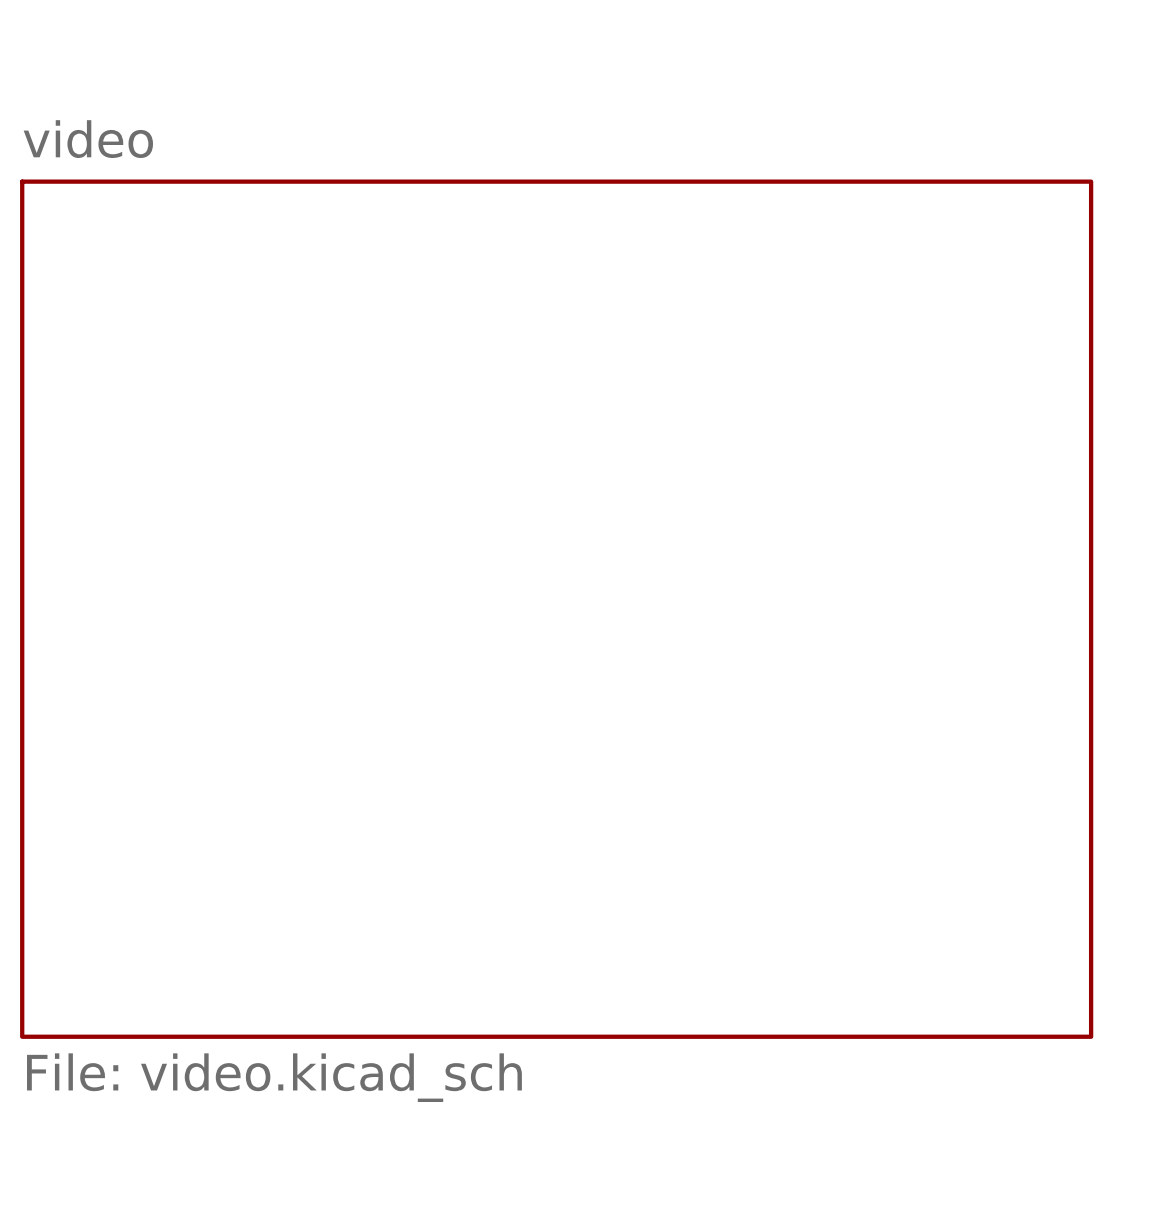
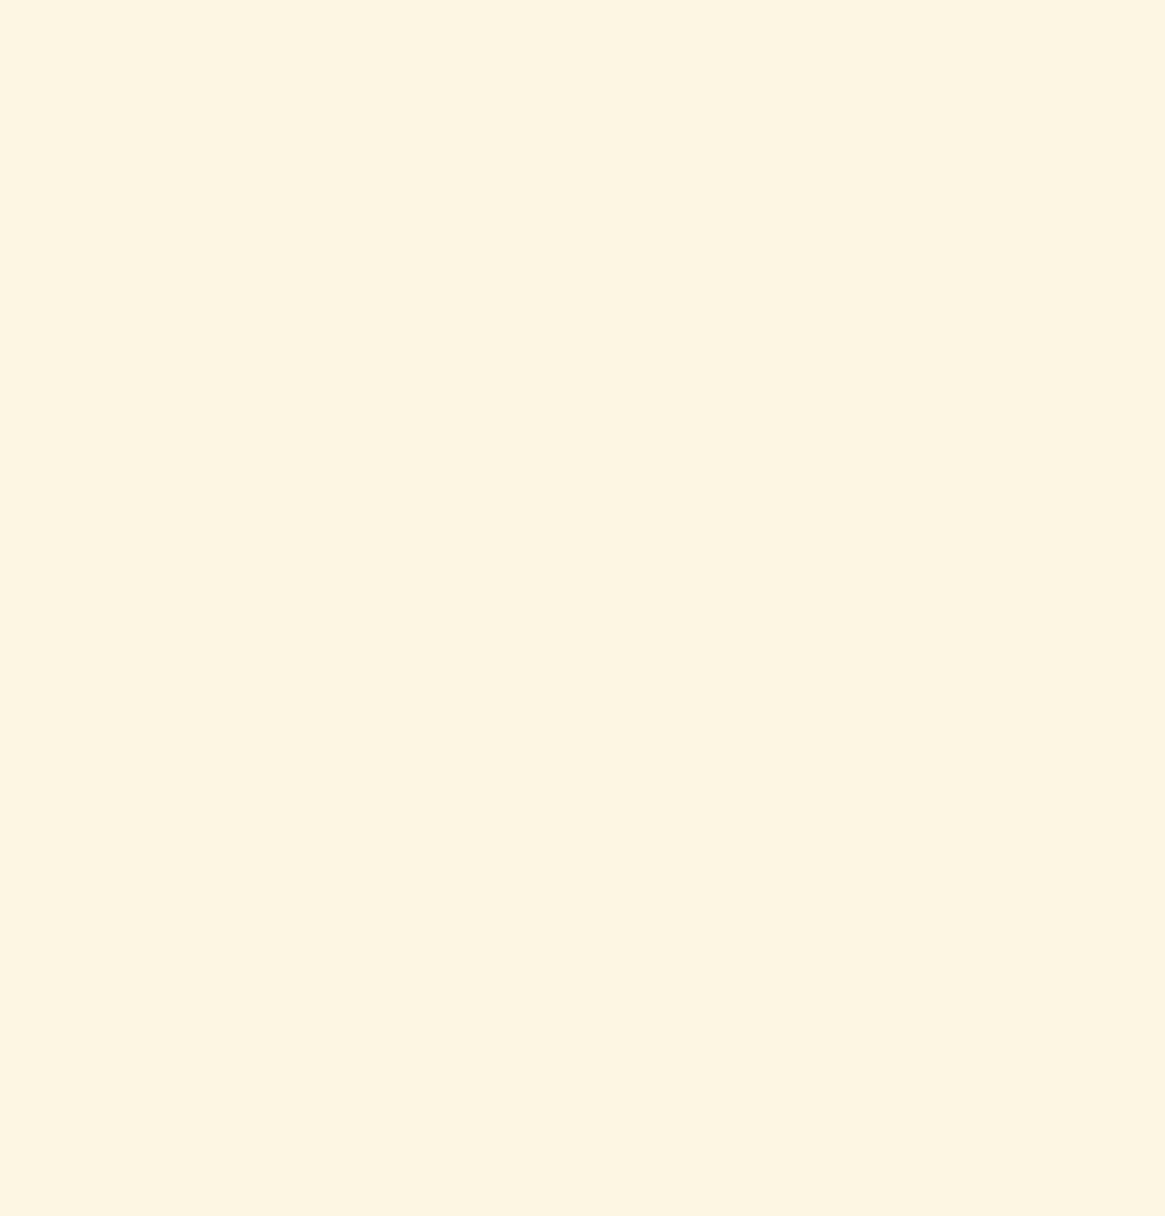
sheet video: File: video.kicad_sch (556, 609) -> none

